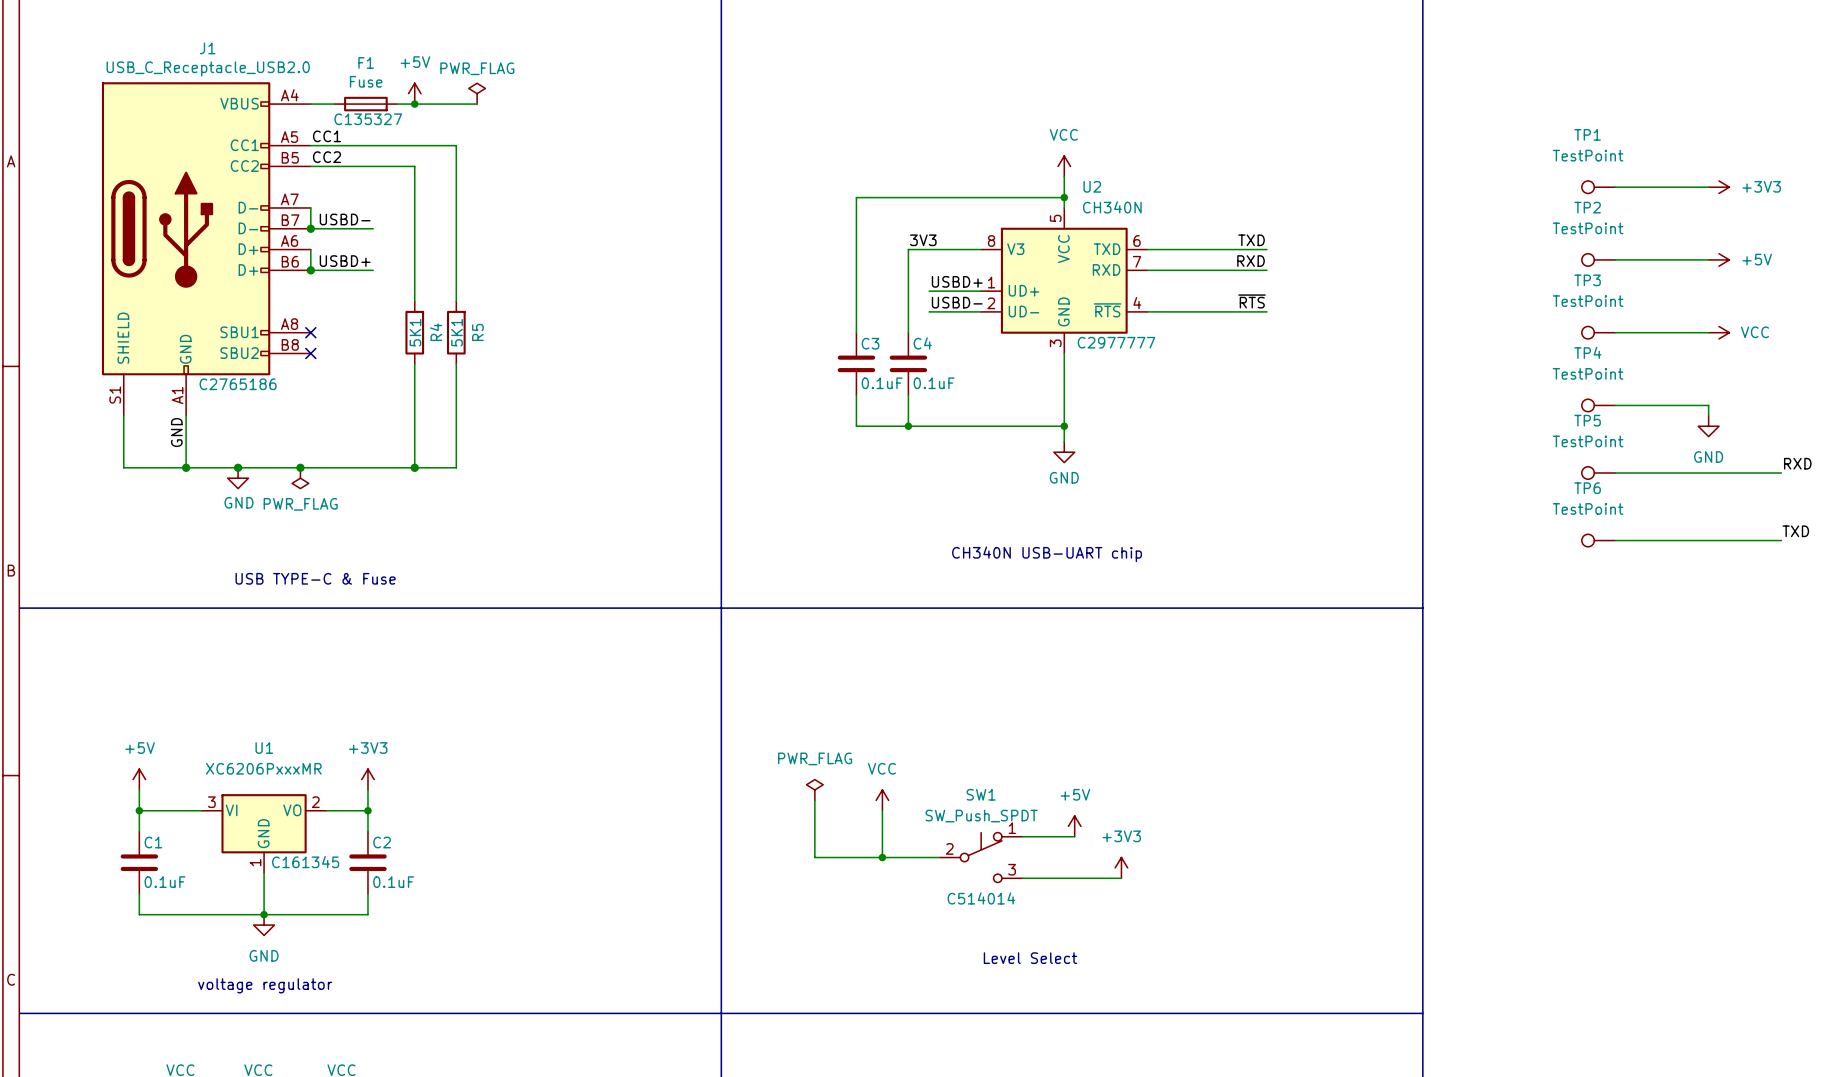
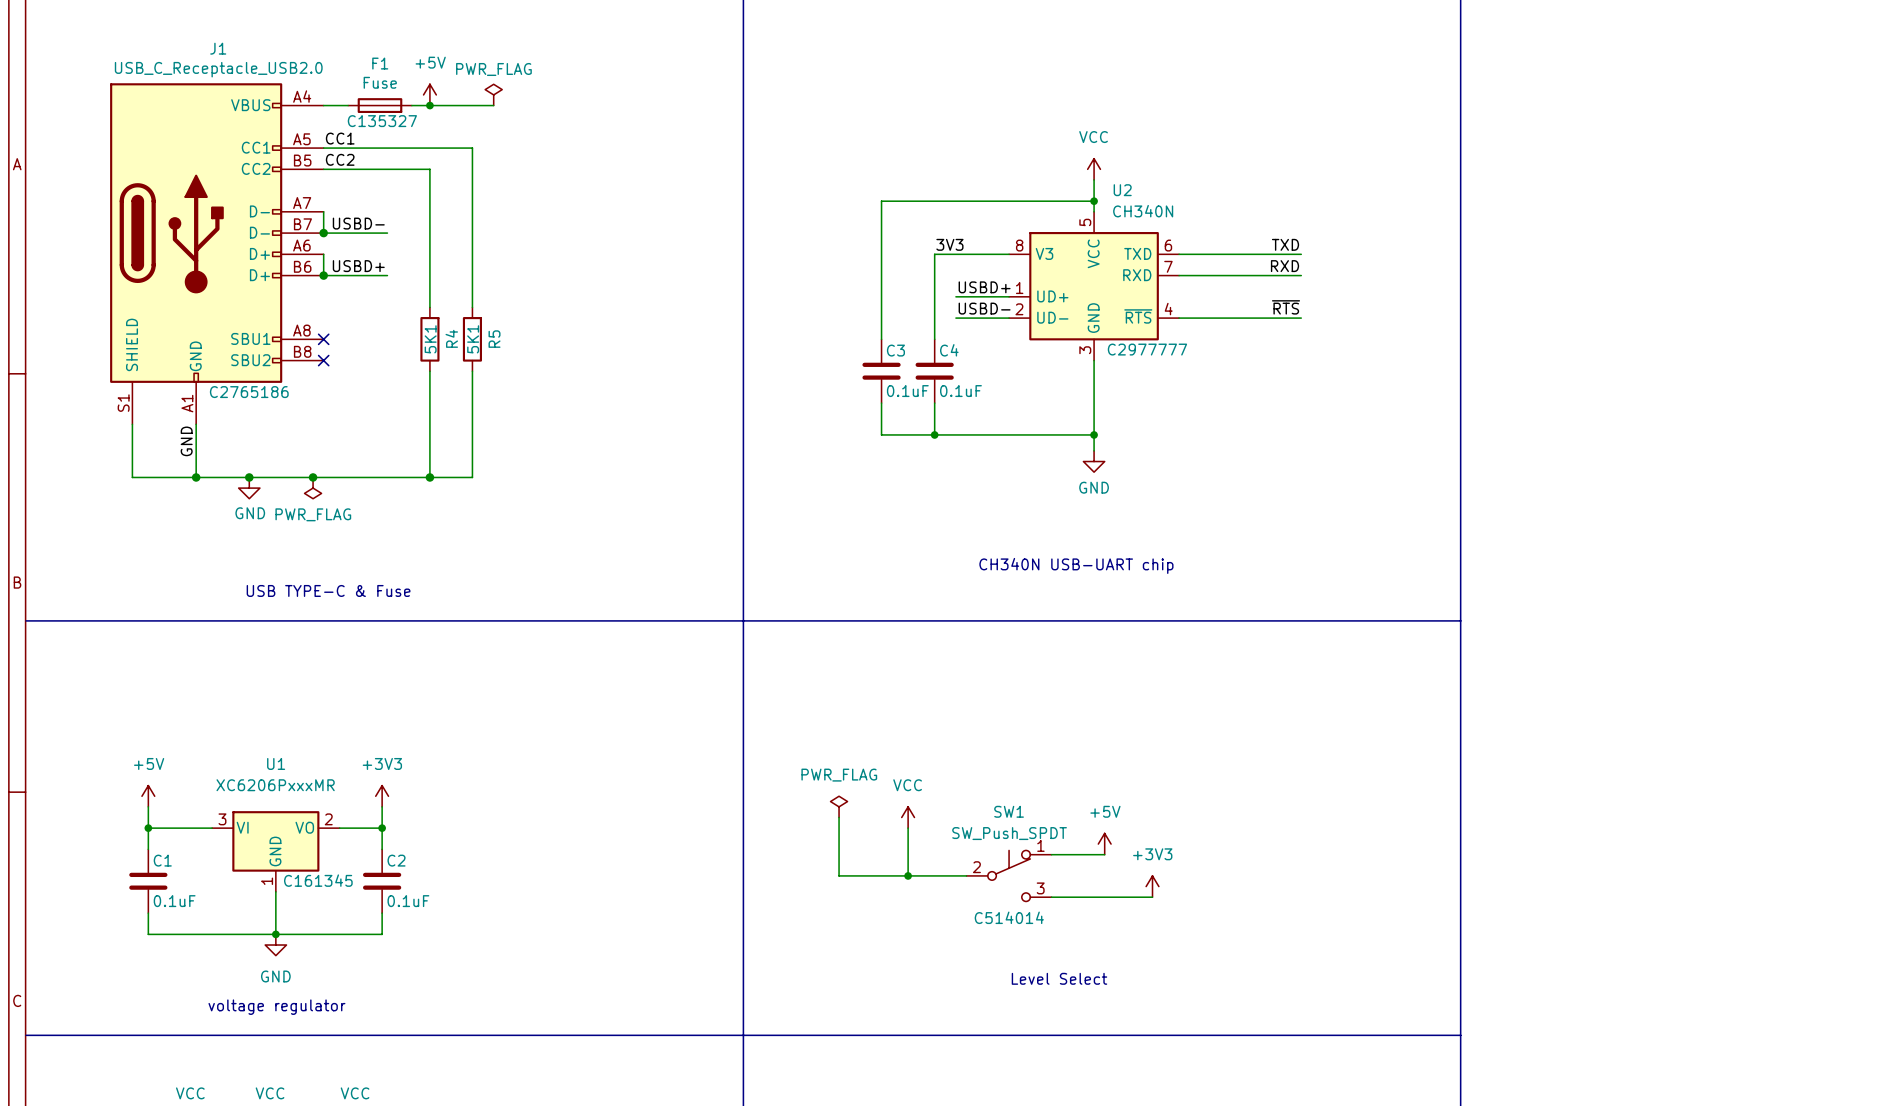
TP1: TestPoint (1598, 187) -> none
wire: (1615, 187) (1708, 187) -> none
power symbol: +3V3 (1719, 187) -> none
TP2: TestPoint (1598, 259) -> none
wire: (1615, 259) (1708, 259) -> none
power symbol: +5V (1719, 259) -> none
TP3: TestPoint (1598, 332) -> none
wire: (1615, 332) (1708, 332) -> none
power symbol: VCC (1719, 332) -> none
TP4: TestPoint (1598, 405) -> none
wire: (1615, 405) (1708, 405) (1708, 415) -> none
power symbol: GND (1708, 426) -> none
label: RXD (1797, 463) -> none
TP5: TestPoint (1598, 473) -> none
wire: (1615, 473) (1781, 473) -> none
label: TXD (1795, 531) -> none
TP6: TestPoint (1598, 540) -> none
wire: (1615, 540) (1781, 540) -> none

